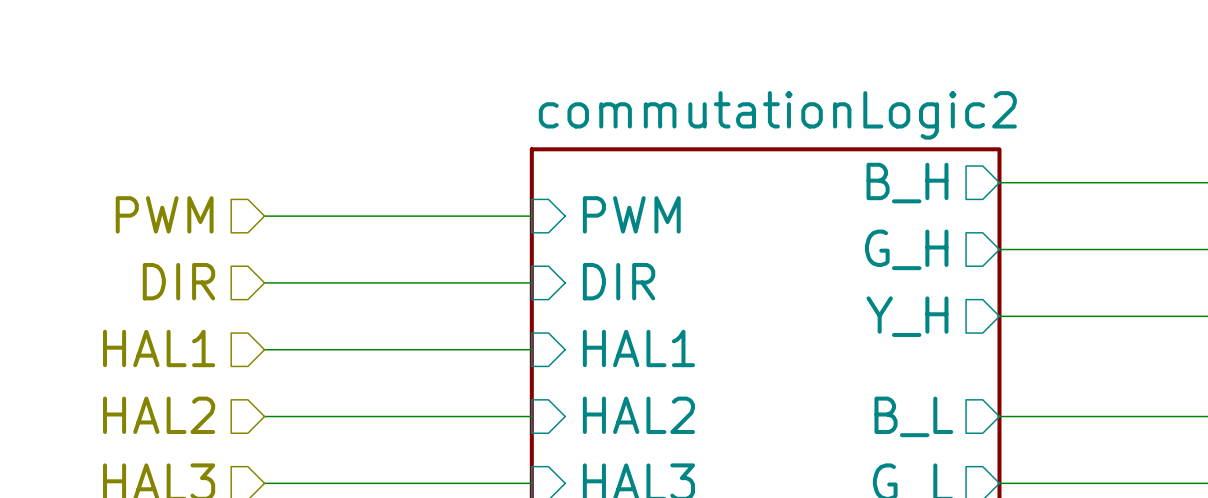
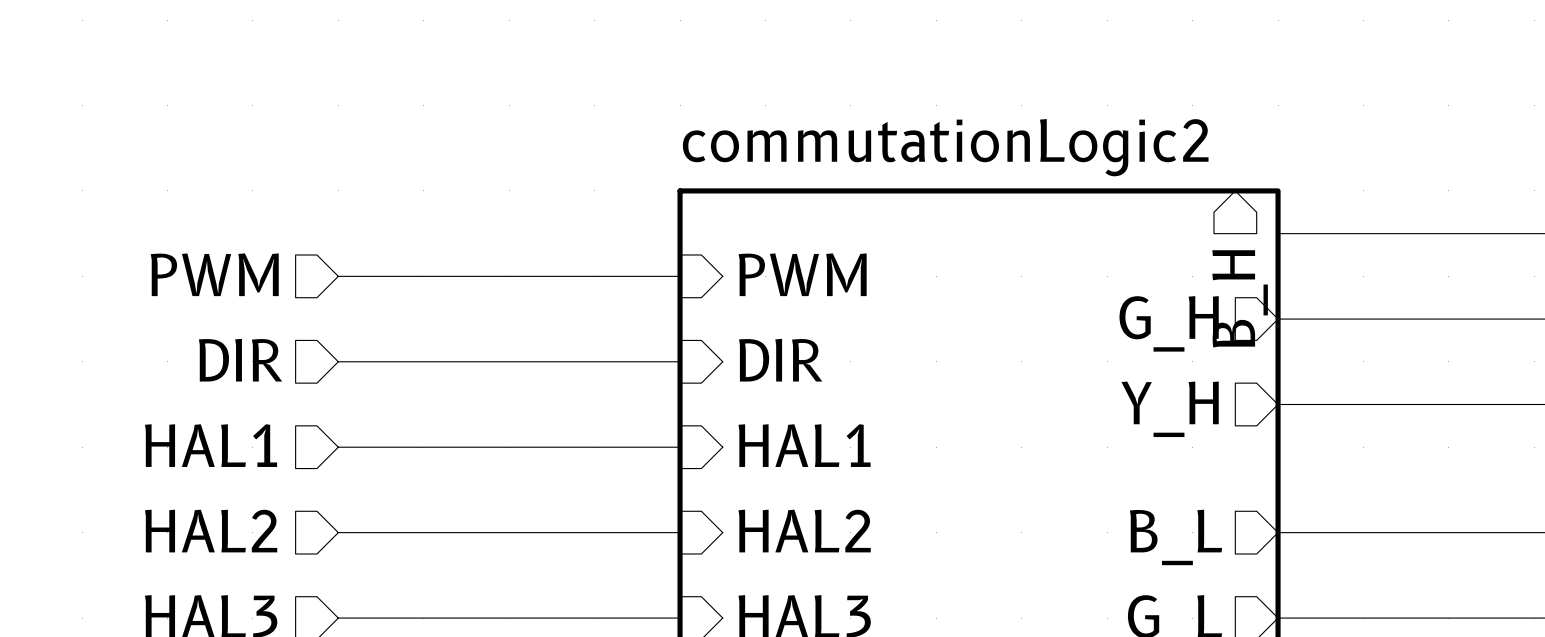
sheet pin rotation: 0° (907, 183) -> 90° counterclockwise (1240, 298)

